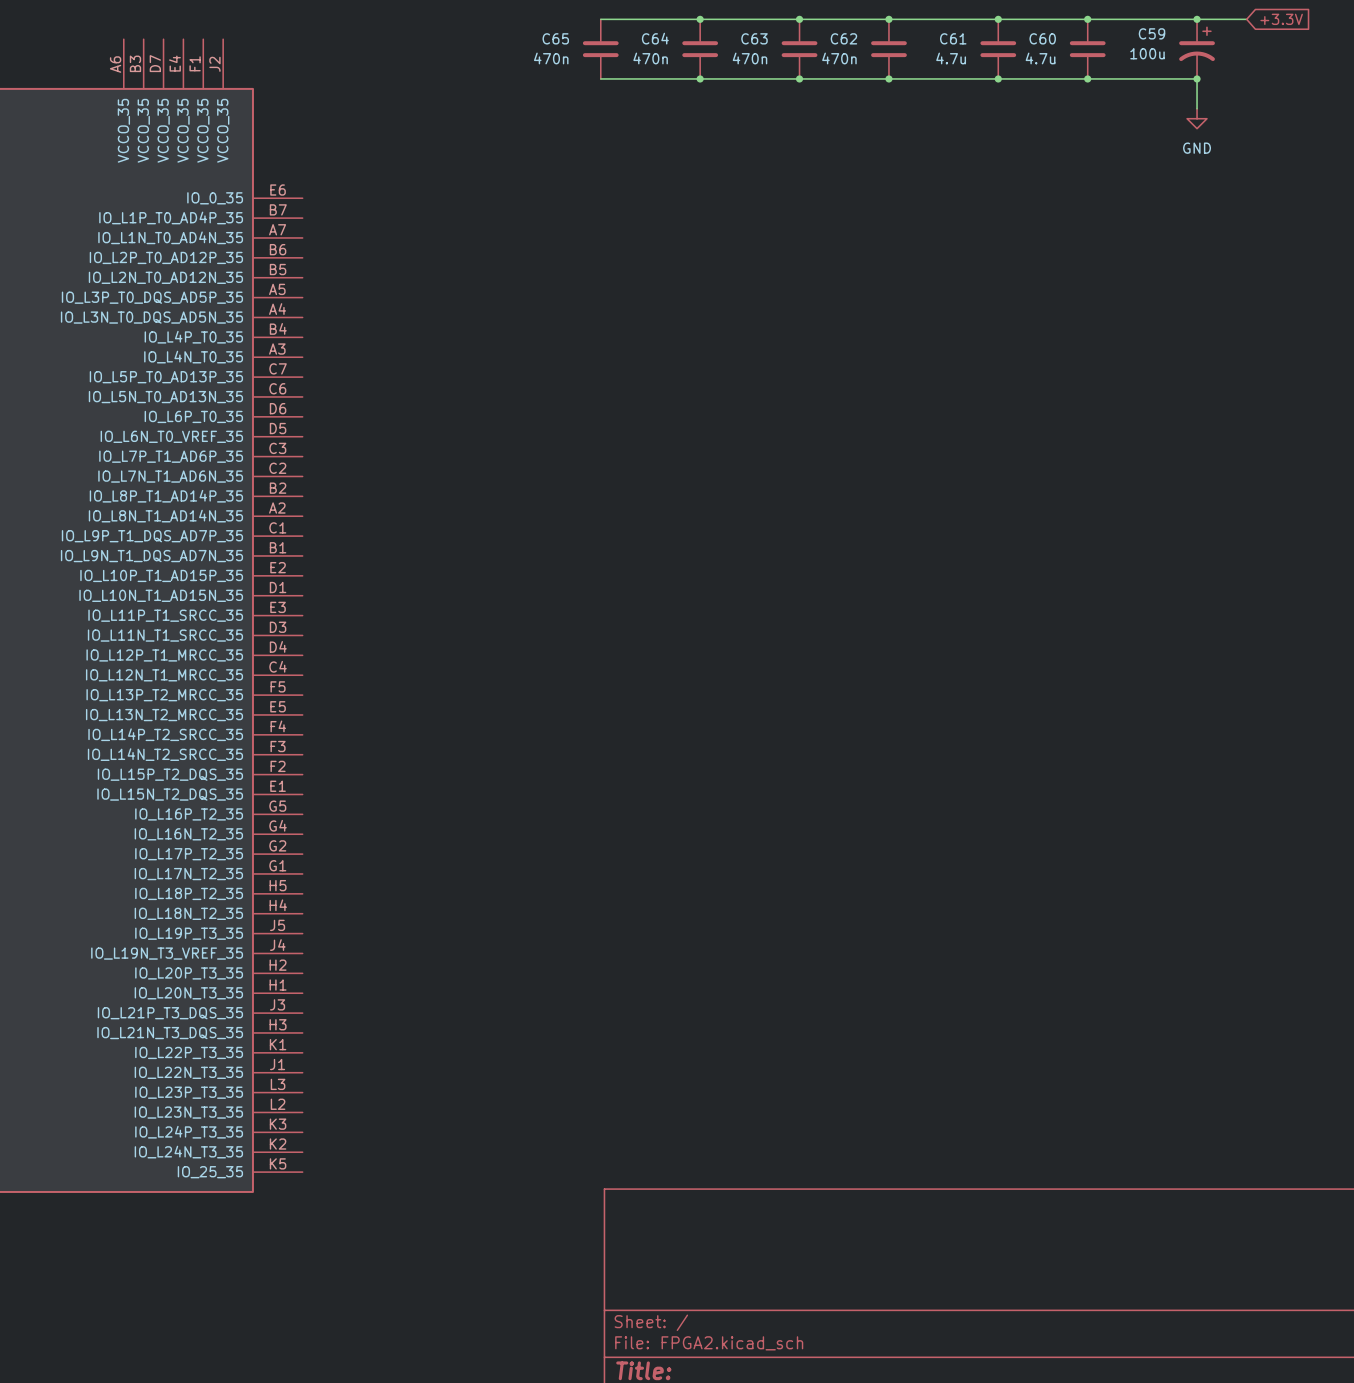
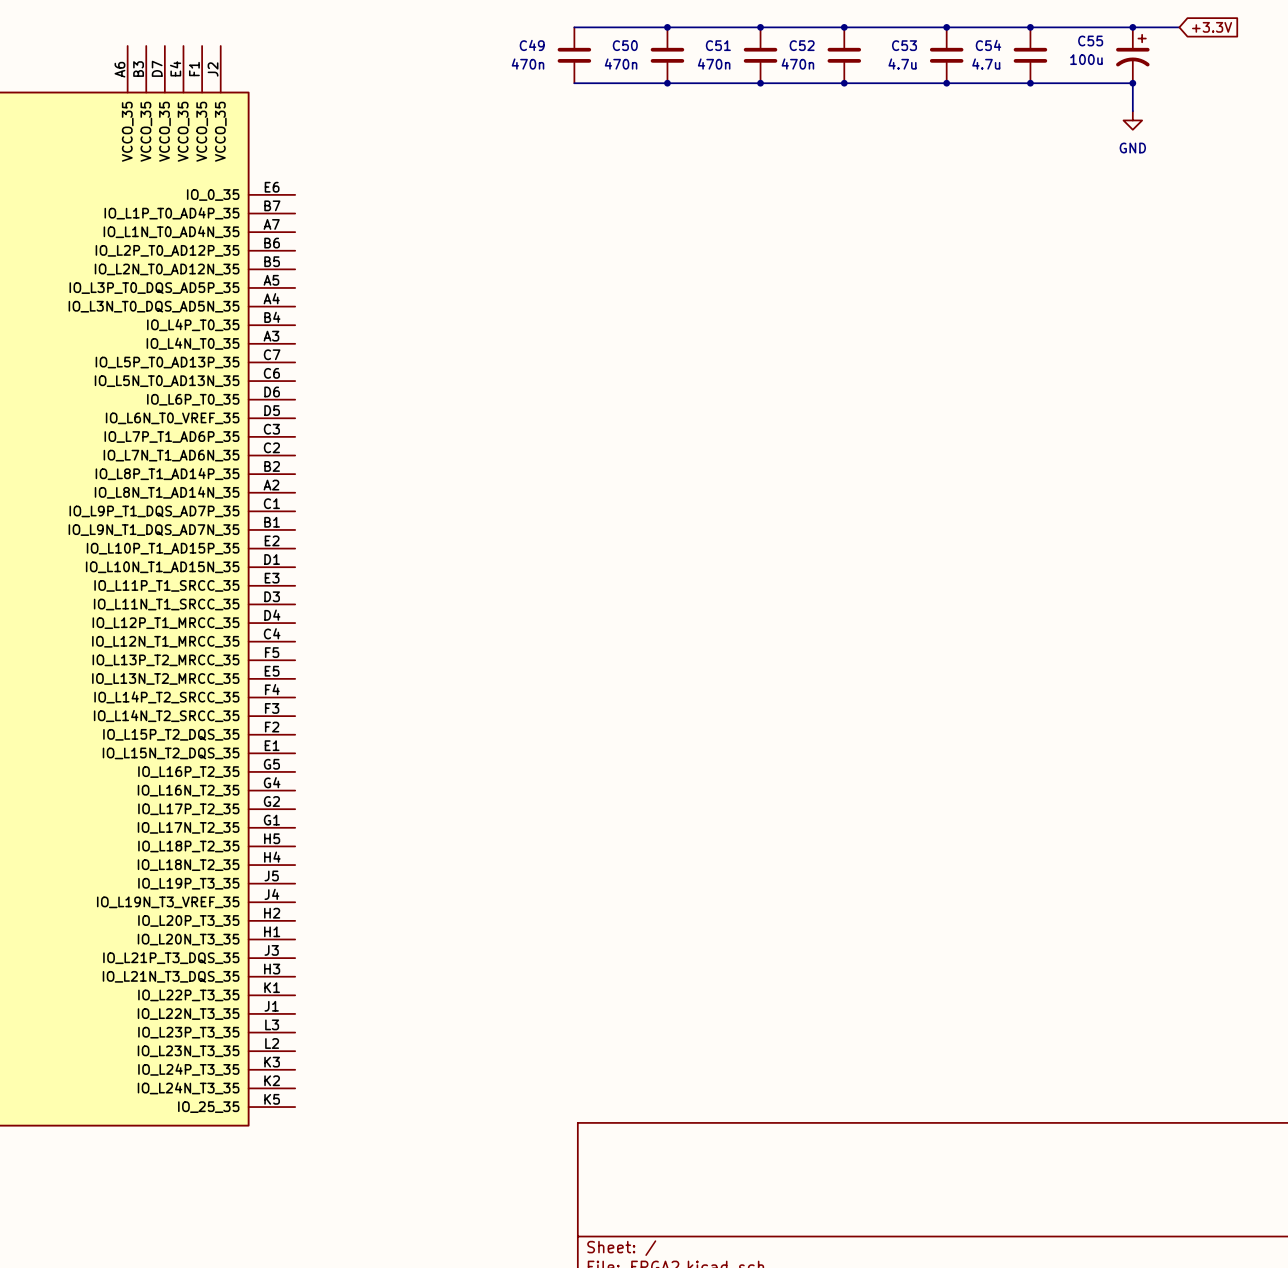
C59 name: C59 (1152, 33) -> C55 (1090, 40)
C65 name: C65 (555, 38) -> C49 (532, 45)
C64 name: C64 (655, 38) -> C50 (625, 45)
C63 name: C63 (754, 38) -> C51 (718, 45)
C62 name: C62 (843, 38) -> C52 (802, 45)
C61 name: C61 (953, 38) -> C53 (904, 45)
C60 name: C60 (1042, 38) -> C54 (988, 45)

